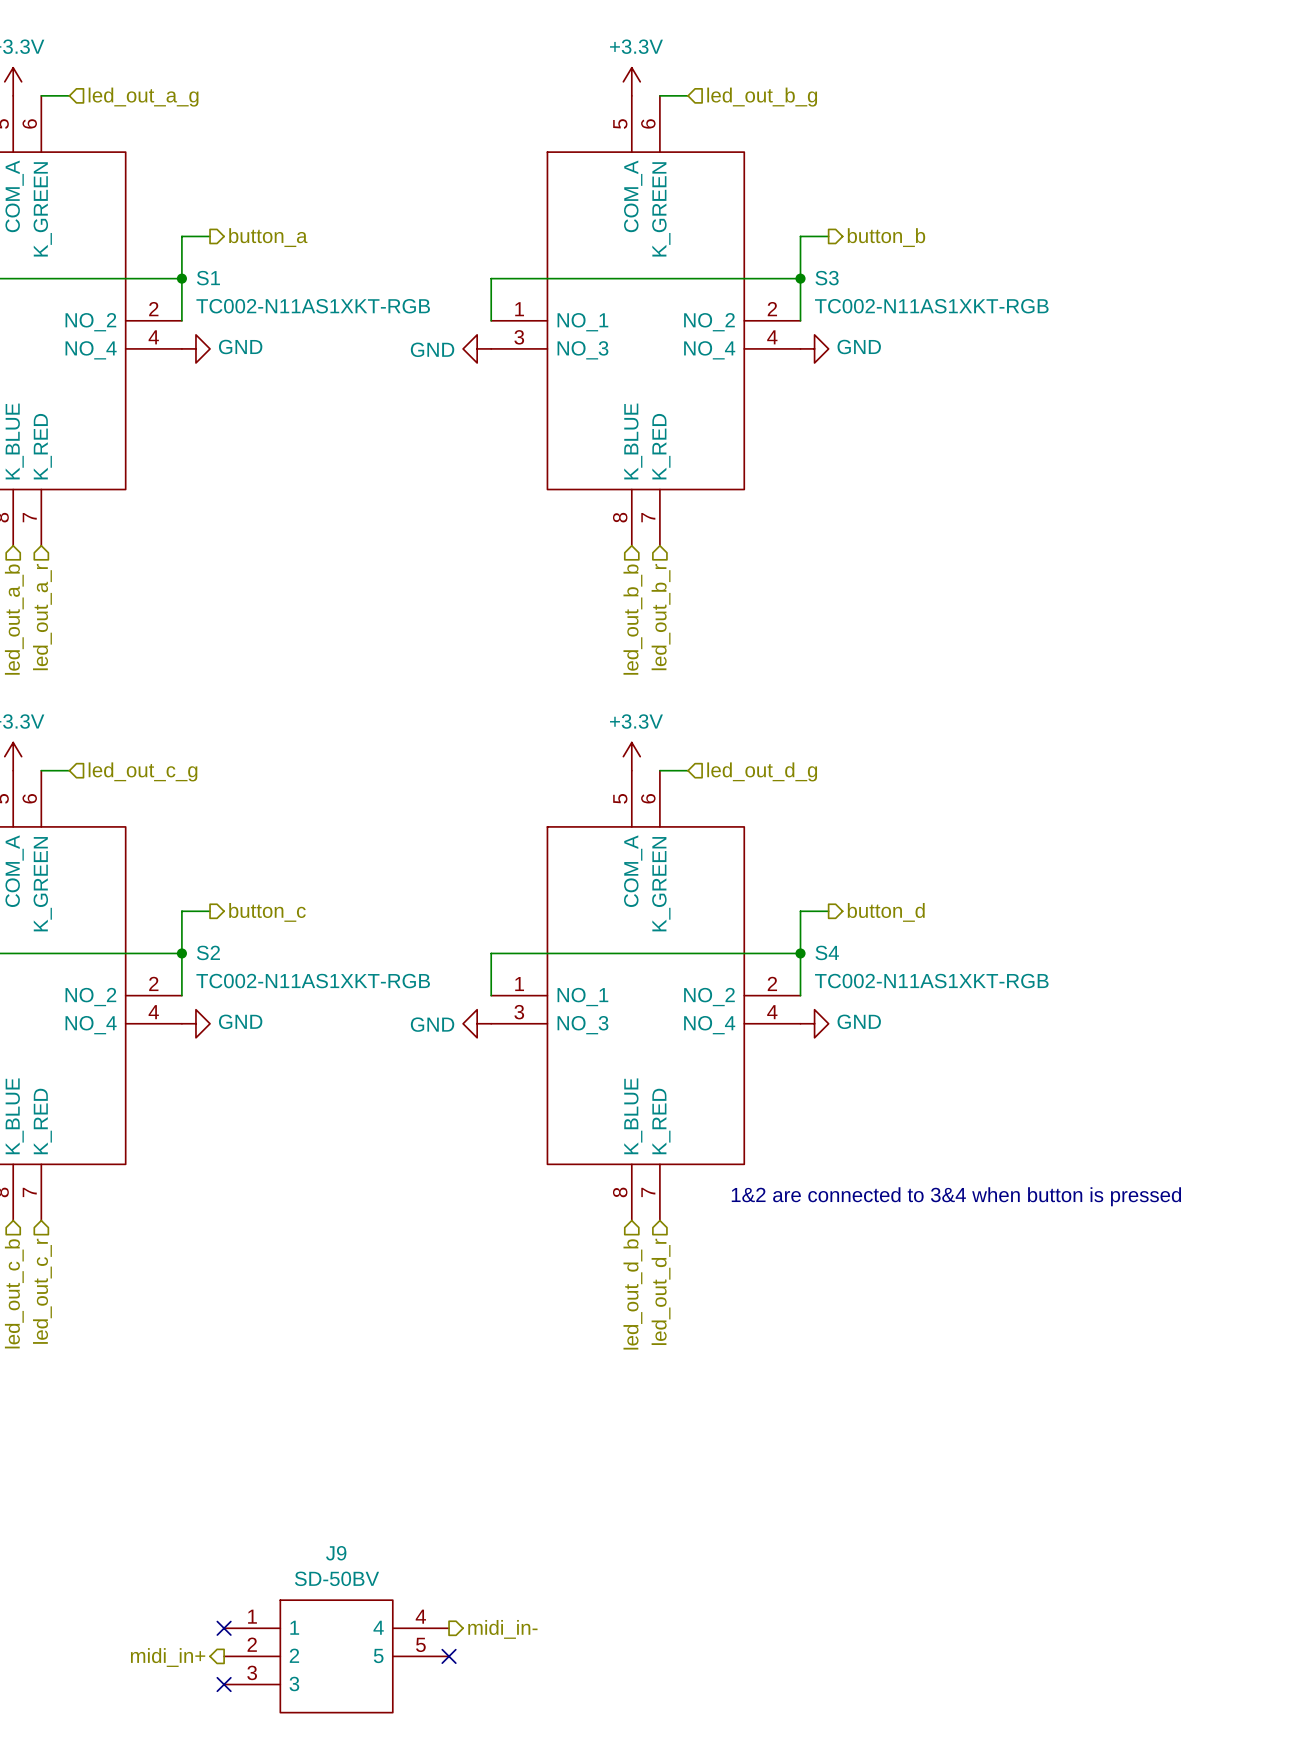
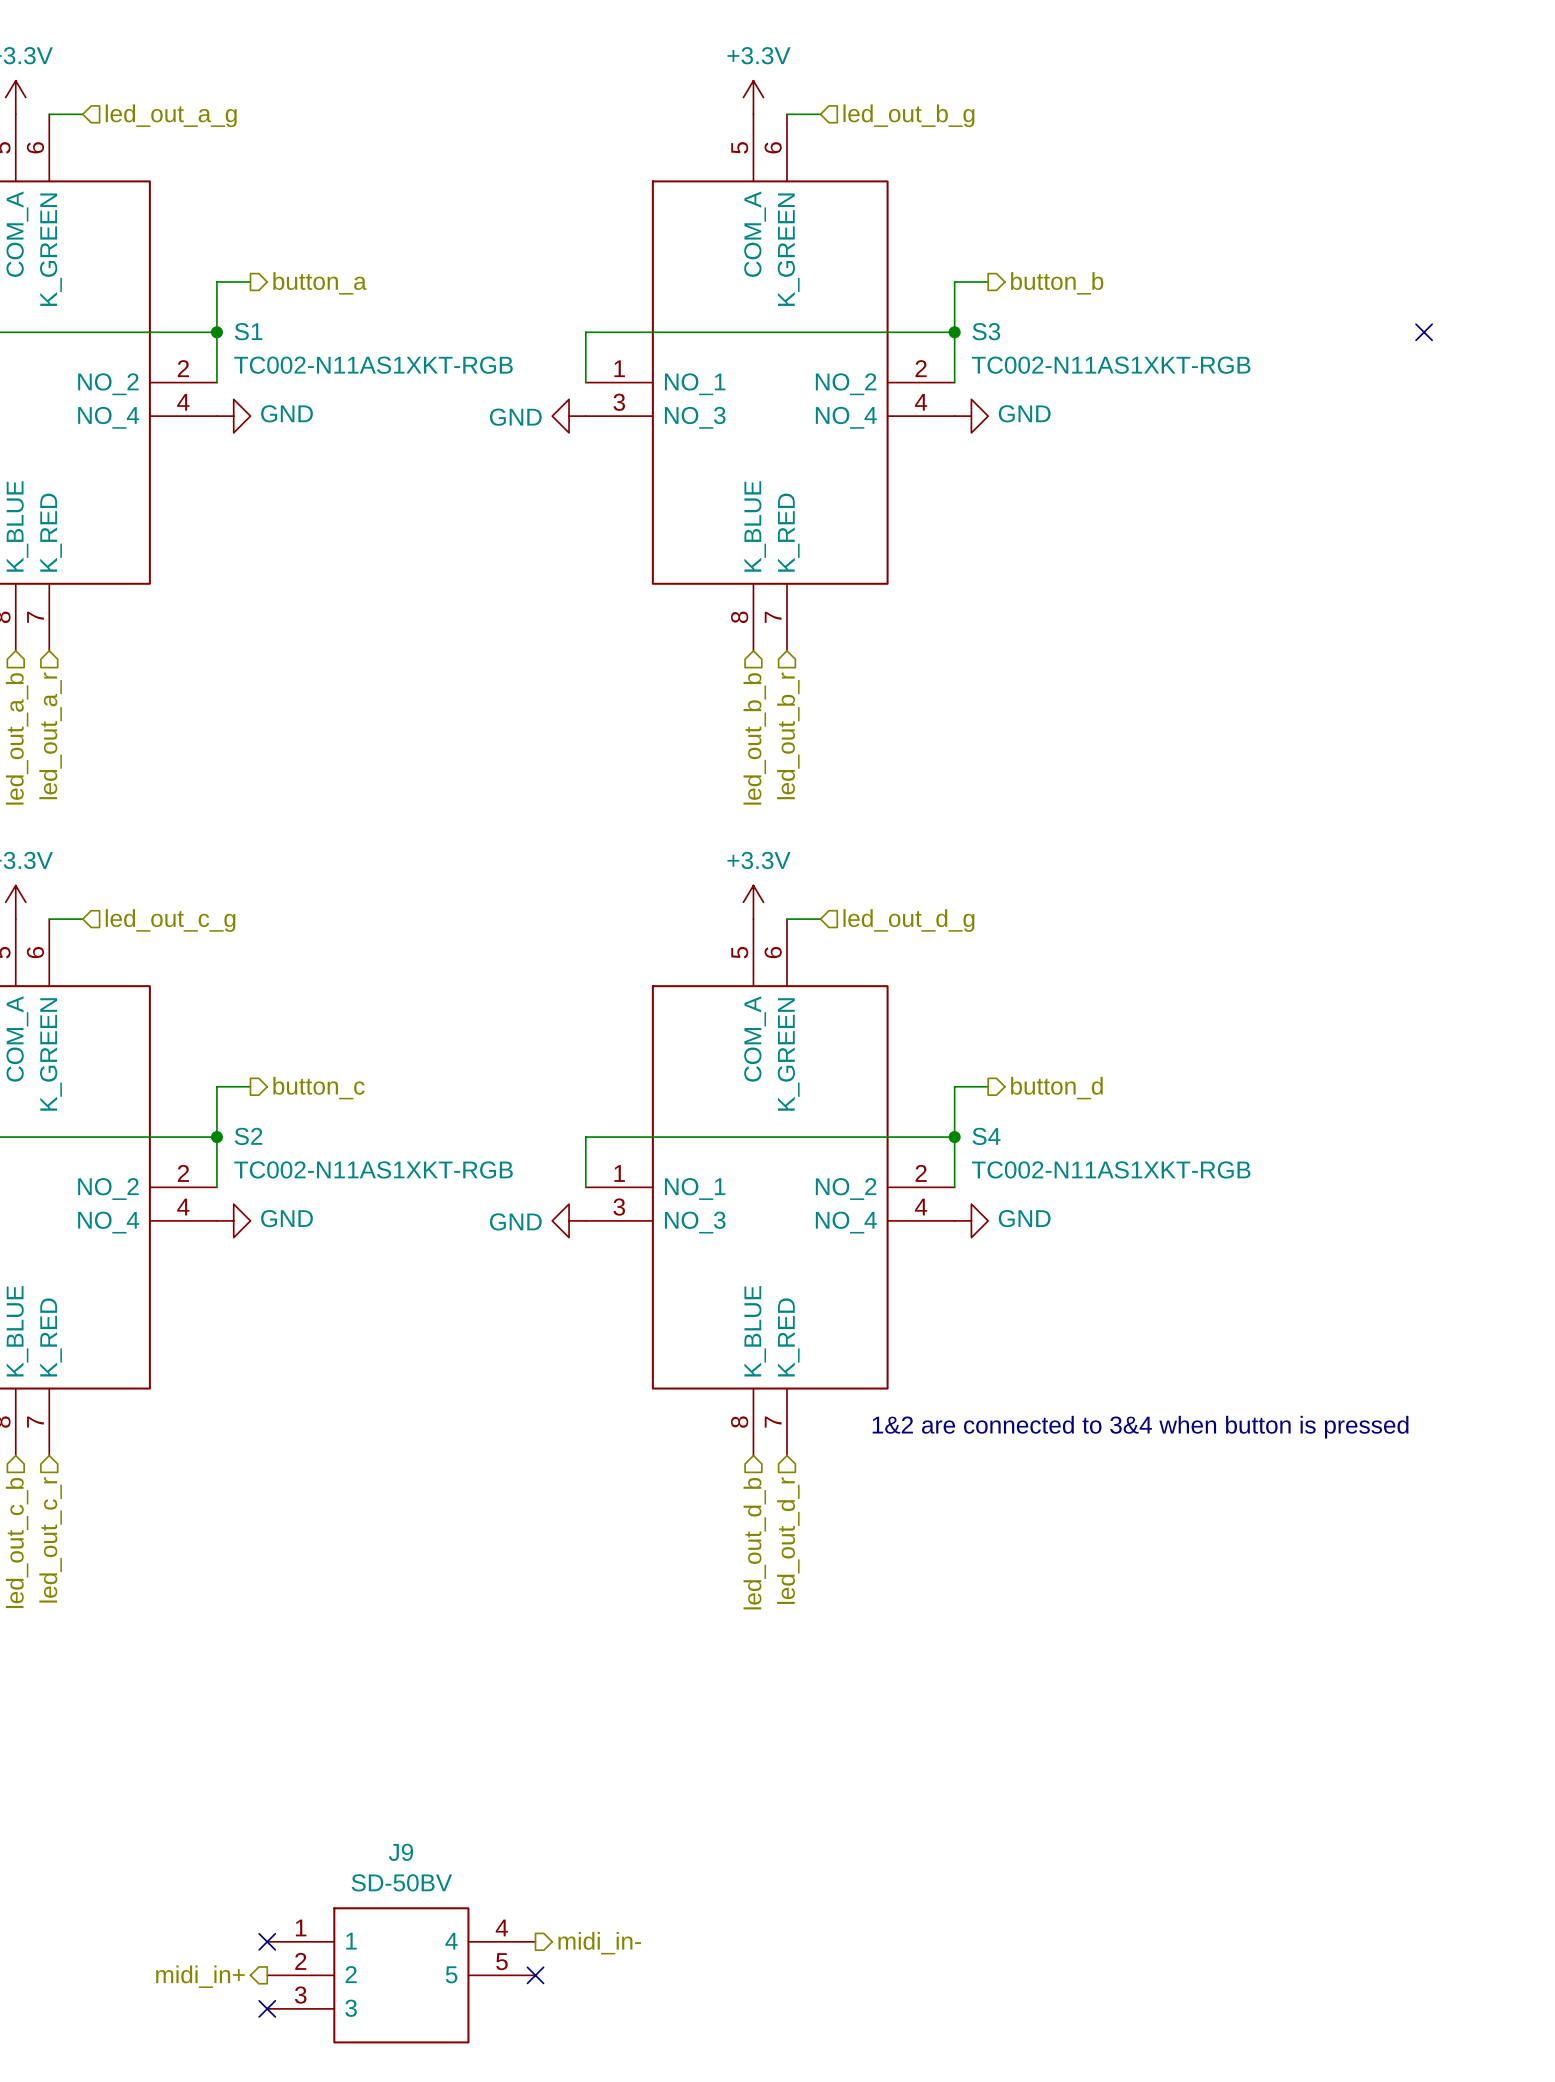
no-connect mark: none -> (1424, 332)

